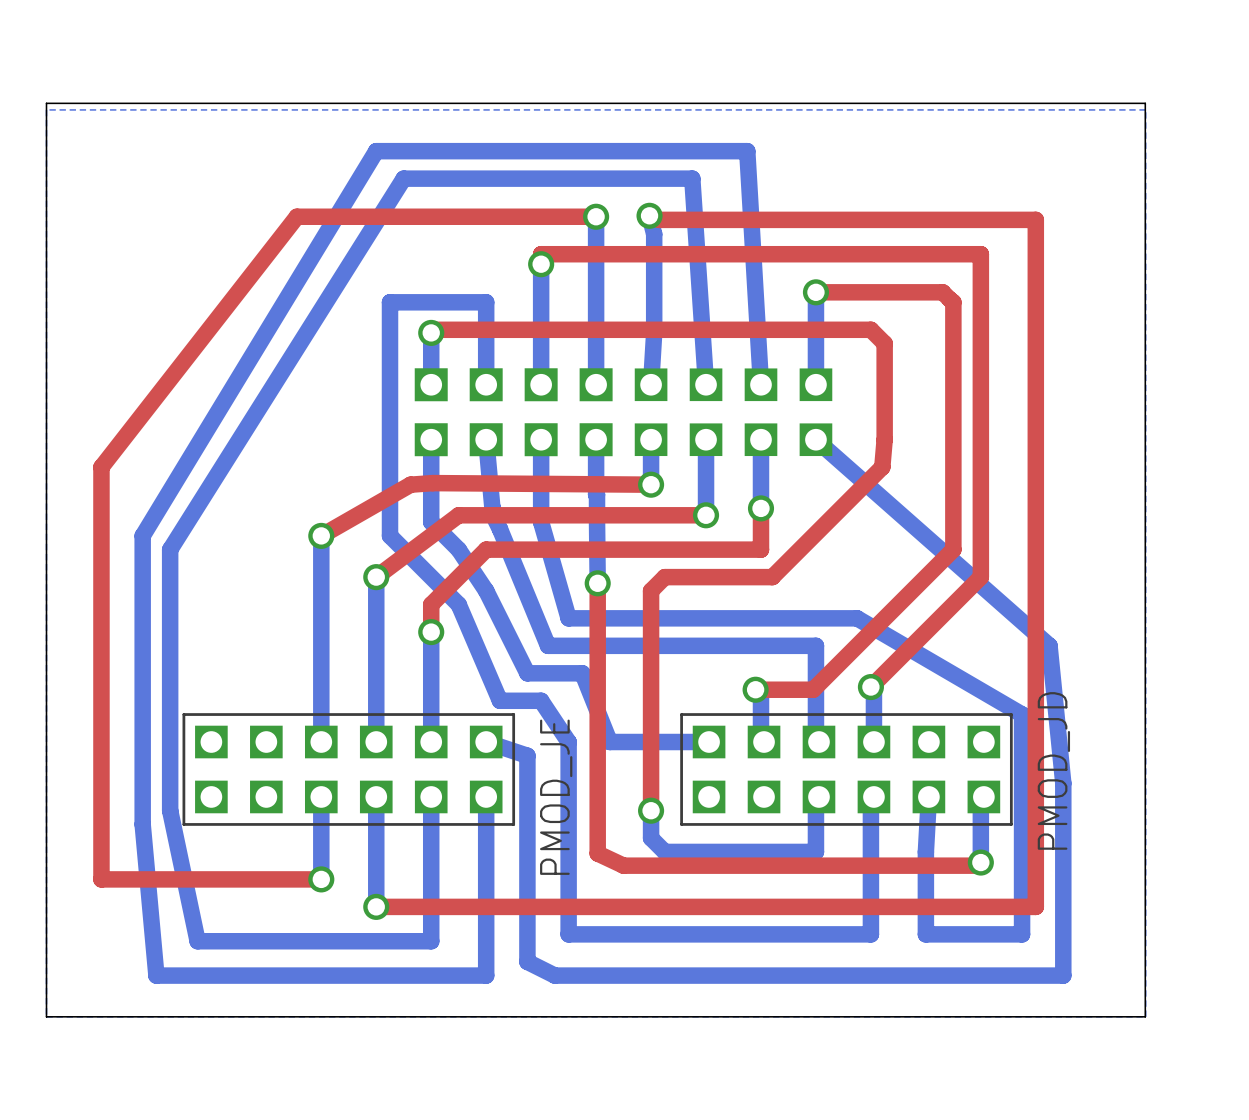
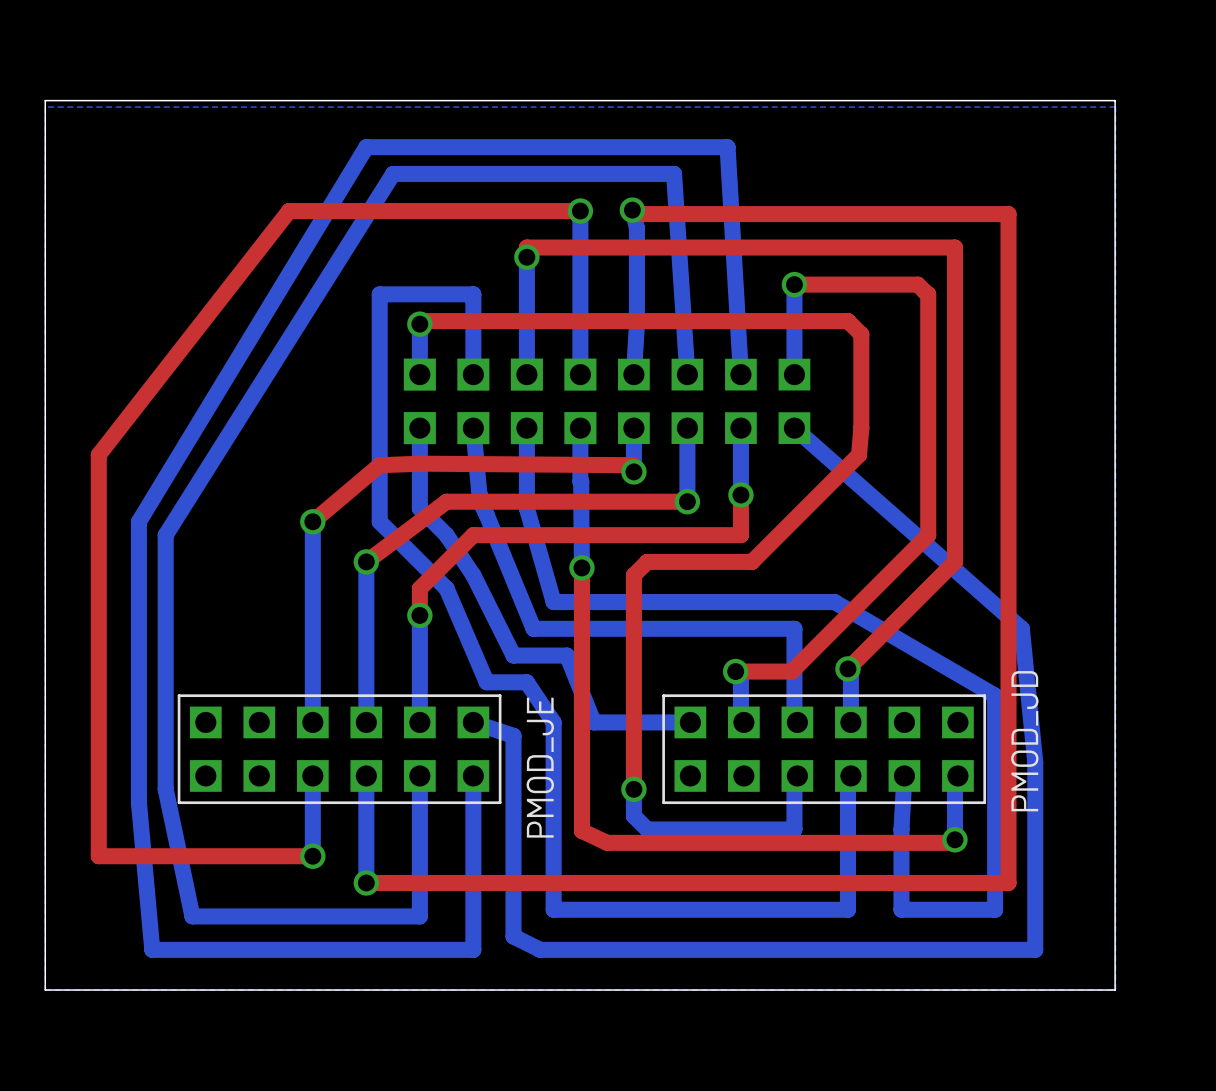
top track: (651, 484) (432, 483) (410, 484) (321, 535) -> (633, 465) (421, 463) (379, 465) (312, 521)

